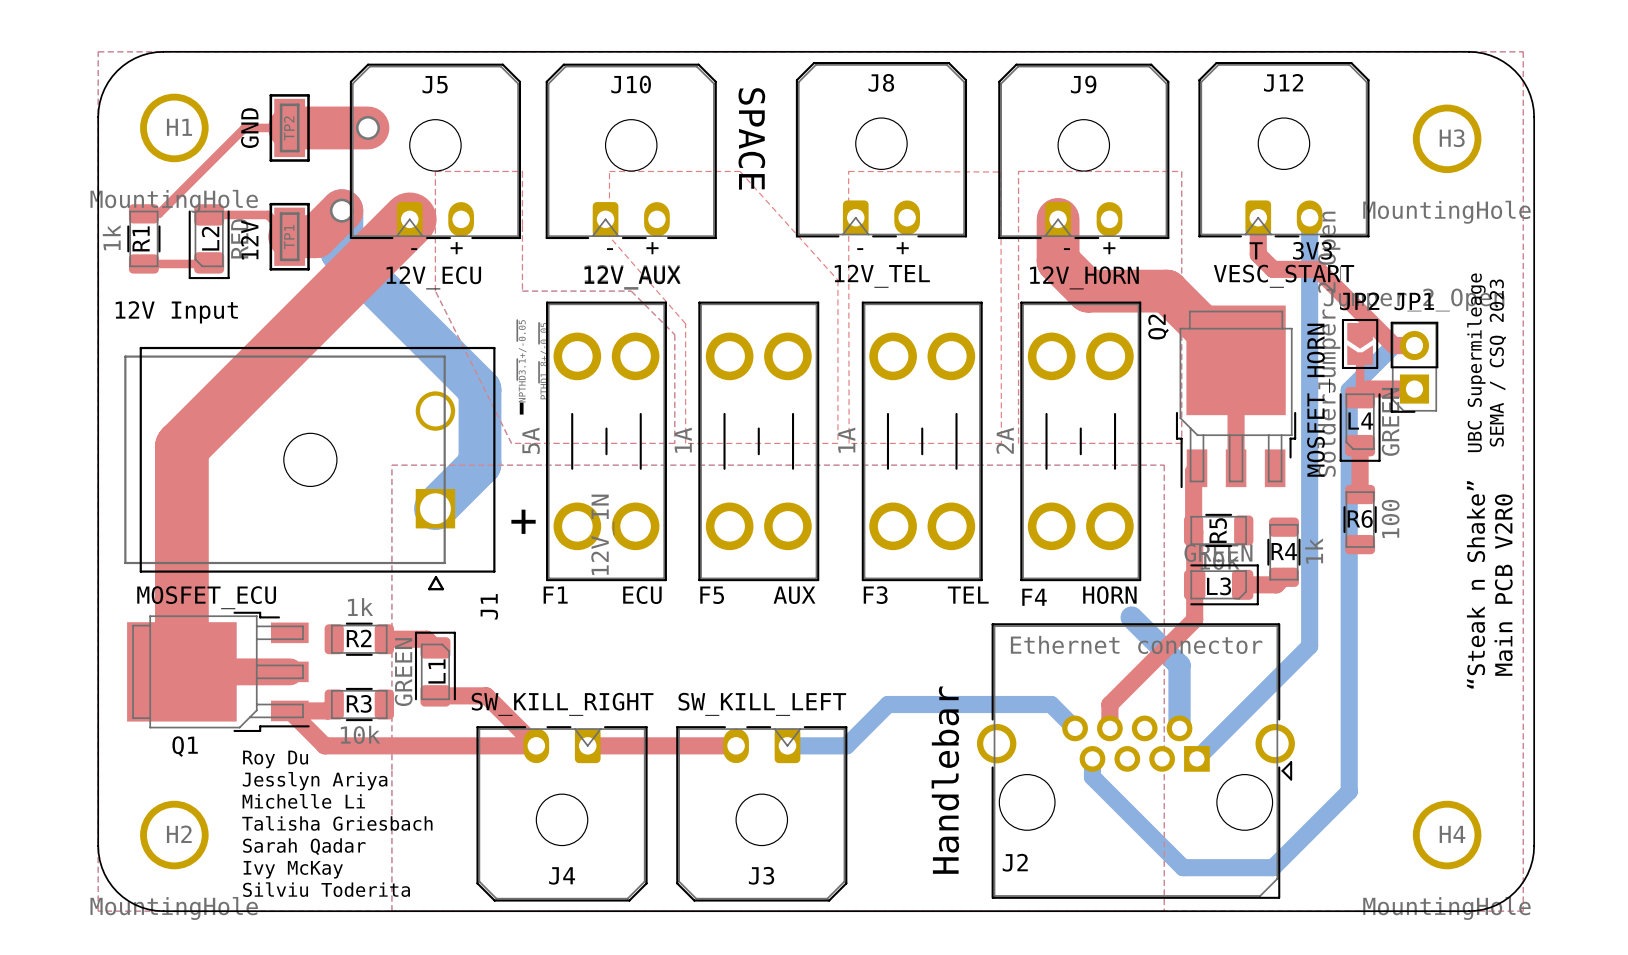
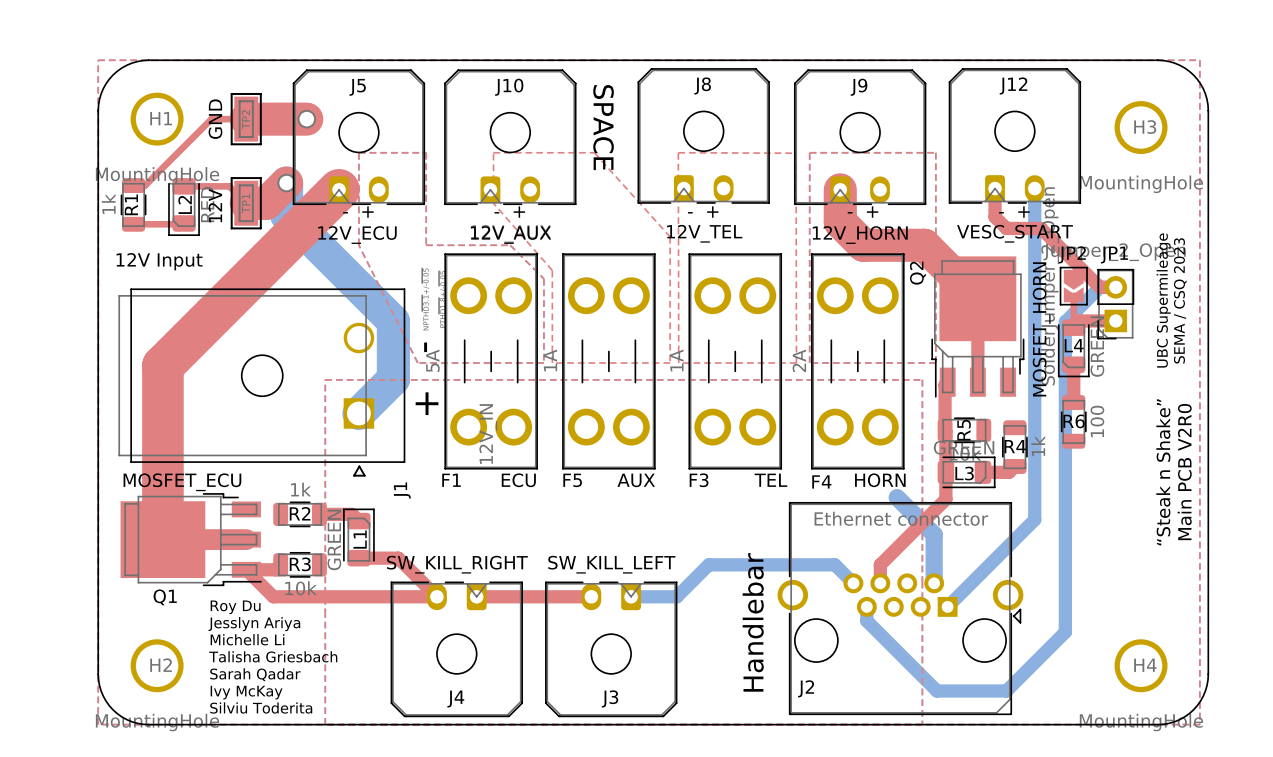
text: T 3V3 (1290, 250) -> - + (1014, 212)

